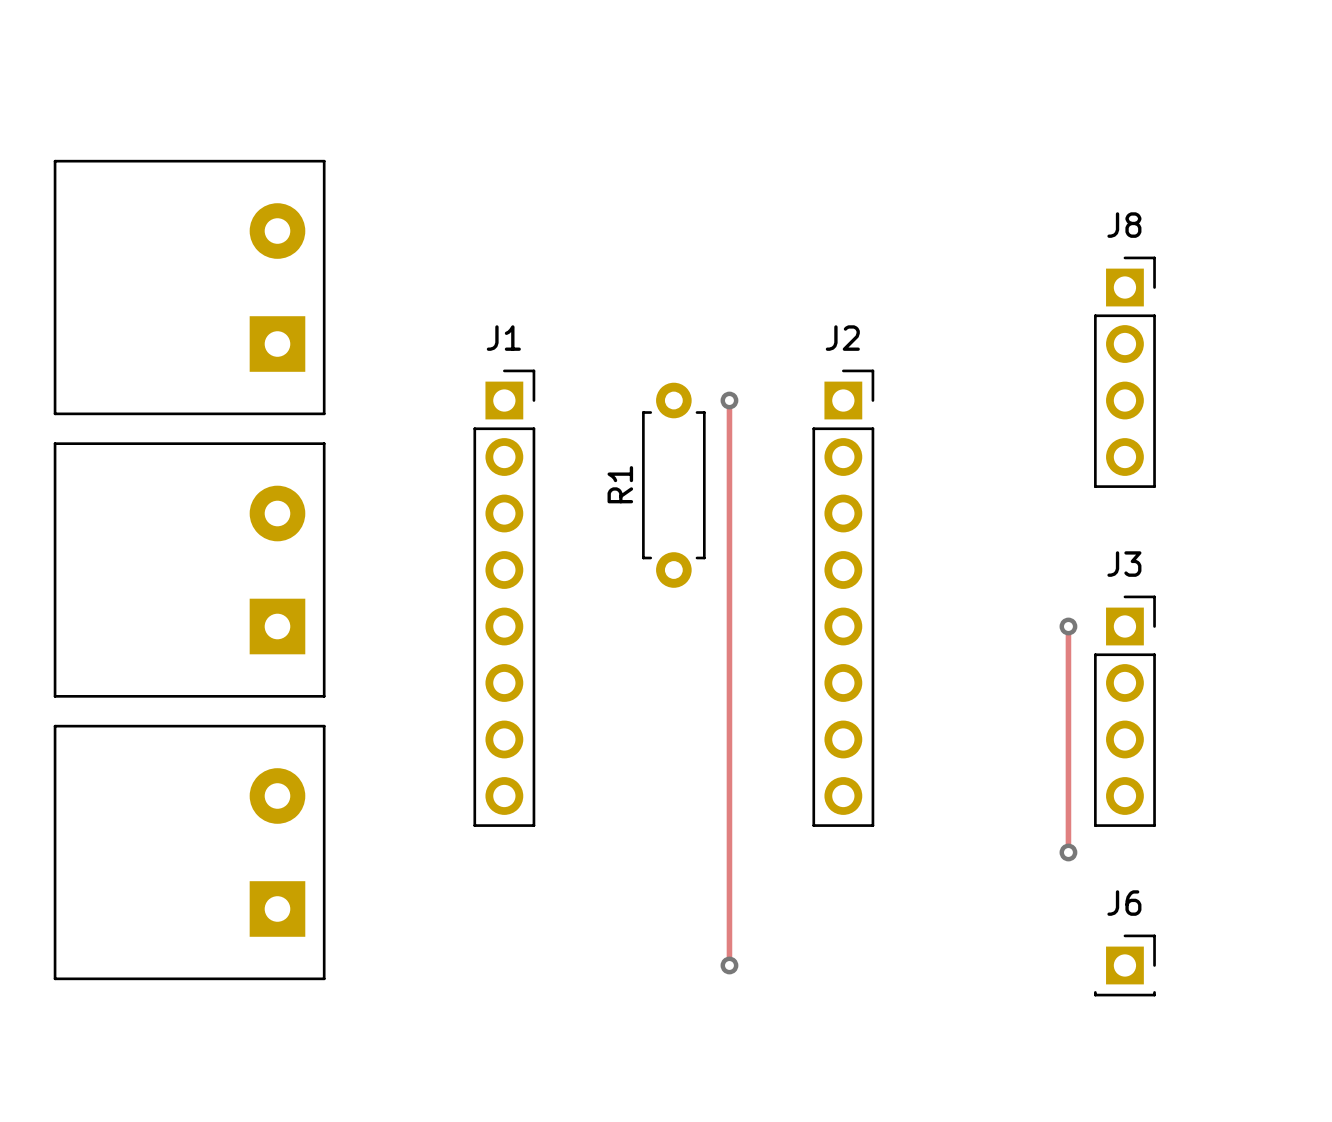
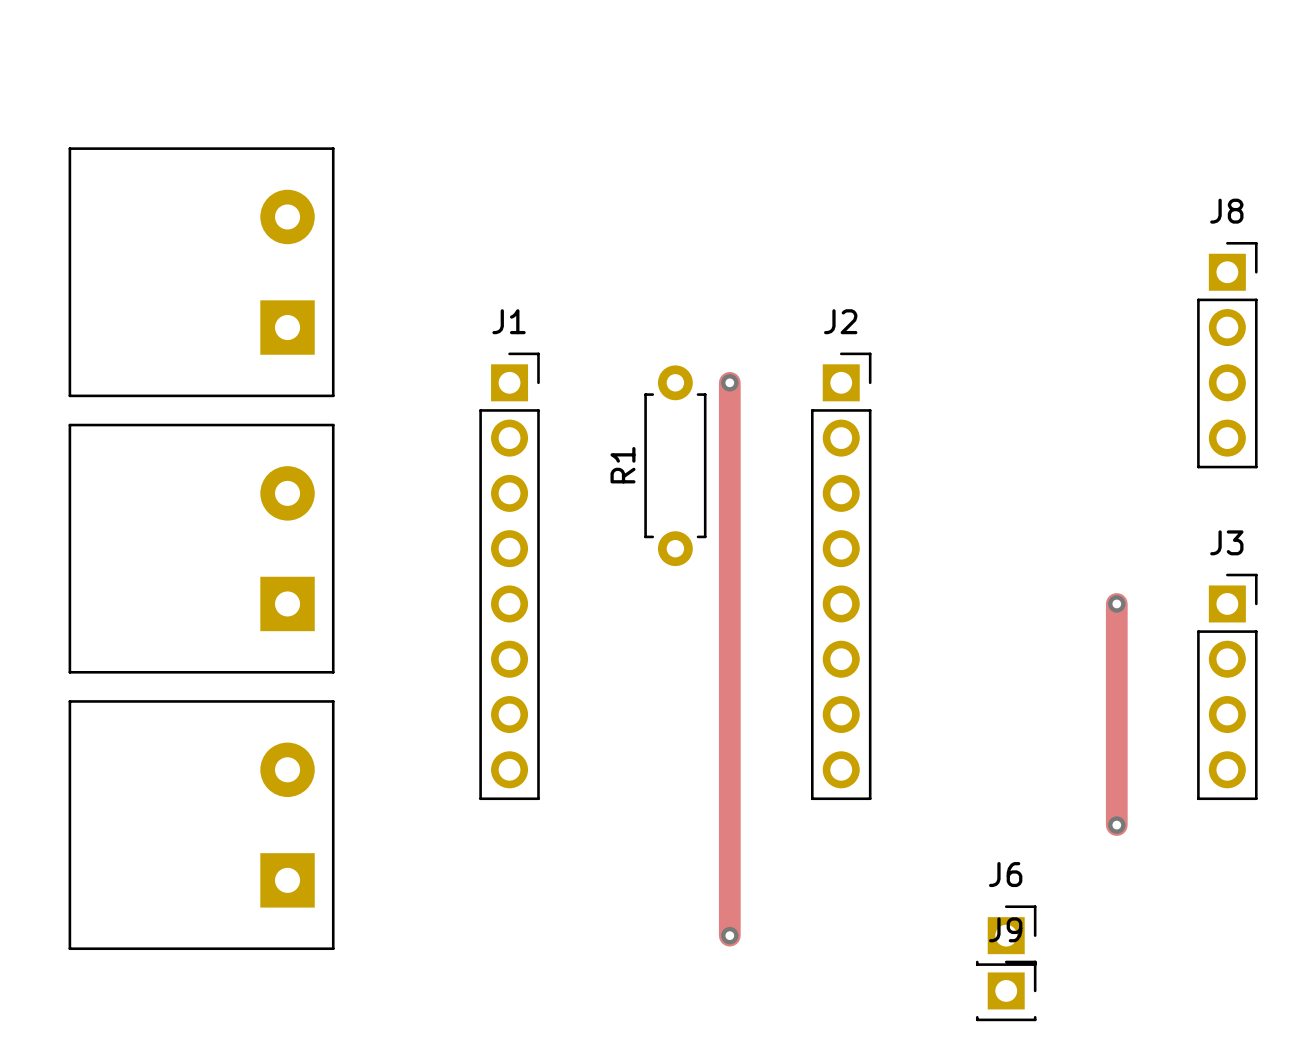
J8 position: (1124, 372) -> (1227, 355)
track width: thin (729, 400) (729, 965) -> thick (729, 382) (729, 935)
track: (1068, 626) (1068, 852) -> (1116, 603) (1116, 825)
via position: (1068, 626) -> (1116, 603)
J3 position: (1124, 711) -> (1227, 686)
via position: (1068, 852) -> (1116, 825)
J6 position: (1124, 965) -> (1006, 935)
J9: none -> (1006, 990)

